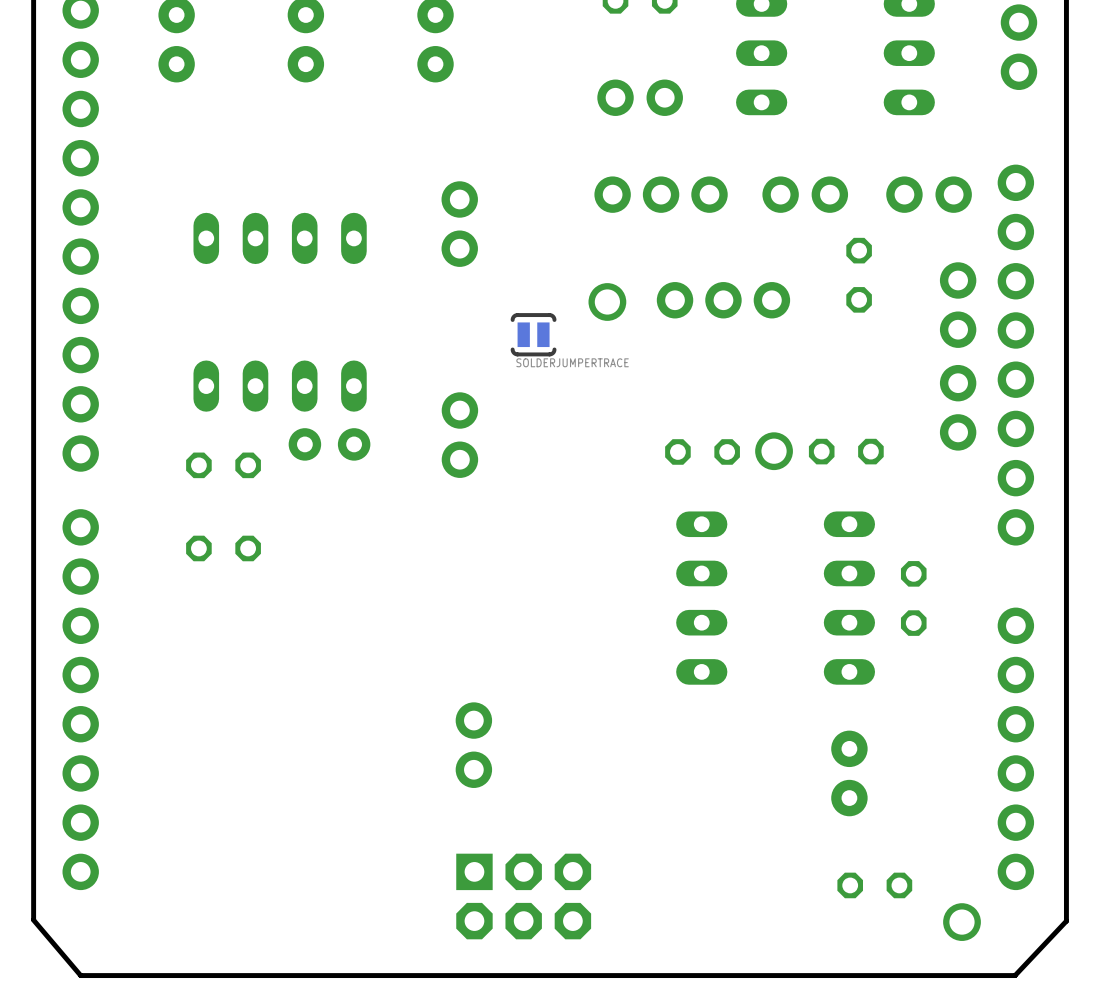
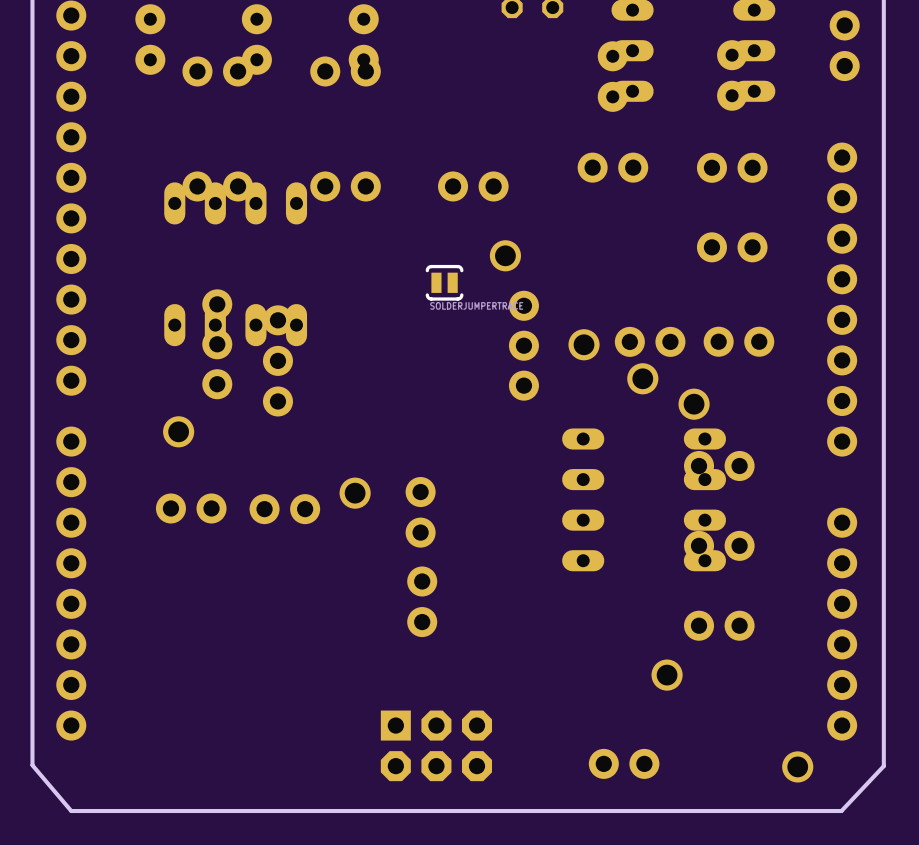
part: none -> (217, 71)
part: none -> (345, 71)
part: none -> (732, 75)
part: none -> (612, 76)
part: (640, 97) -> none
part: (661, 194) -> none
part: (805, 194) -> none
part: (929, 194) -> none
part: none -> (612, 167)
part: none -> (732, 167)
part: none -> (217, 186)
part: none -> (473, 186)
part rotation: 0° (459, 224) -> 90° clockwise (345, 186)
part: (859, 275) -> none
part: none -> (732, 247)
part: (723, 300) -> none
part: (958, 305) -> none
part: none -> (650, 341)
part: none -> (738, 341)
part: (958, 407) -> none
part: none -> (217, 344)
part: none -> (584, 344)
part: none -> (523, 345)
part footprint: [288, 428, 371, 461] -> [262, 305, 293, 417]
part: (459, 435) -> none
part: (702, 451) -> none
part: (846, 451) -> none
part: (223, 465) -> none
part: none -> (694, 404)
part: none -> (178, 431)
part: (223, 548) -> none
part: none -> (719, 466)
part: none -> (355, 493)
part: (913, 598) -> none
part: none -> (191, 508)
part: none -> (284, 509)
part: none -> (420, 512)
part: none -> (719, 545)
part position: (473, 745) -> (422, 601)
part: none -> (719, 625)
part: (849, 773) -> none
part: none -> (667, 675)
part: (874, 885) -> none
part: none -> (624, 763)

